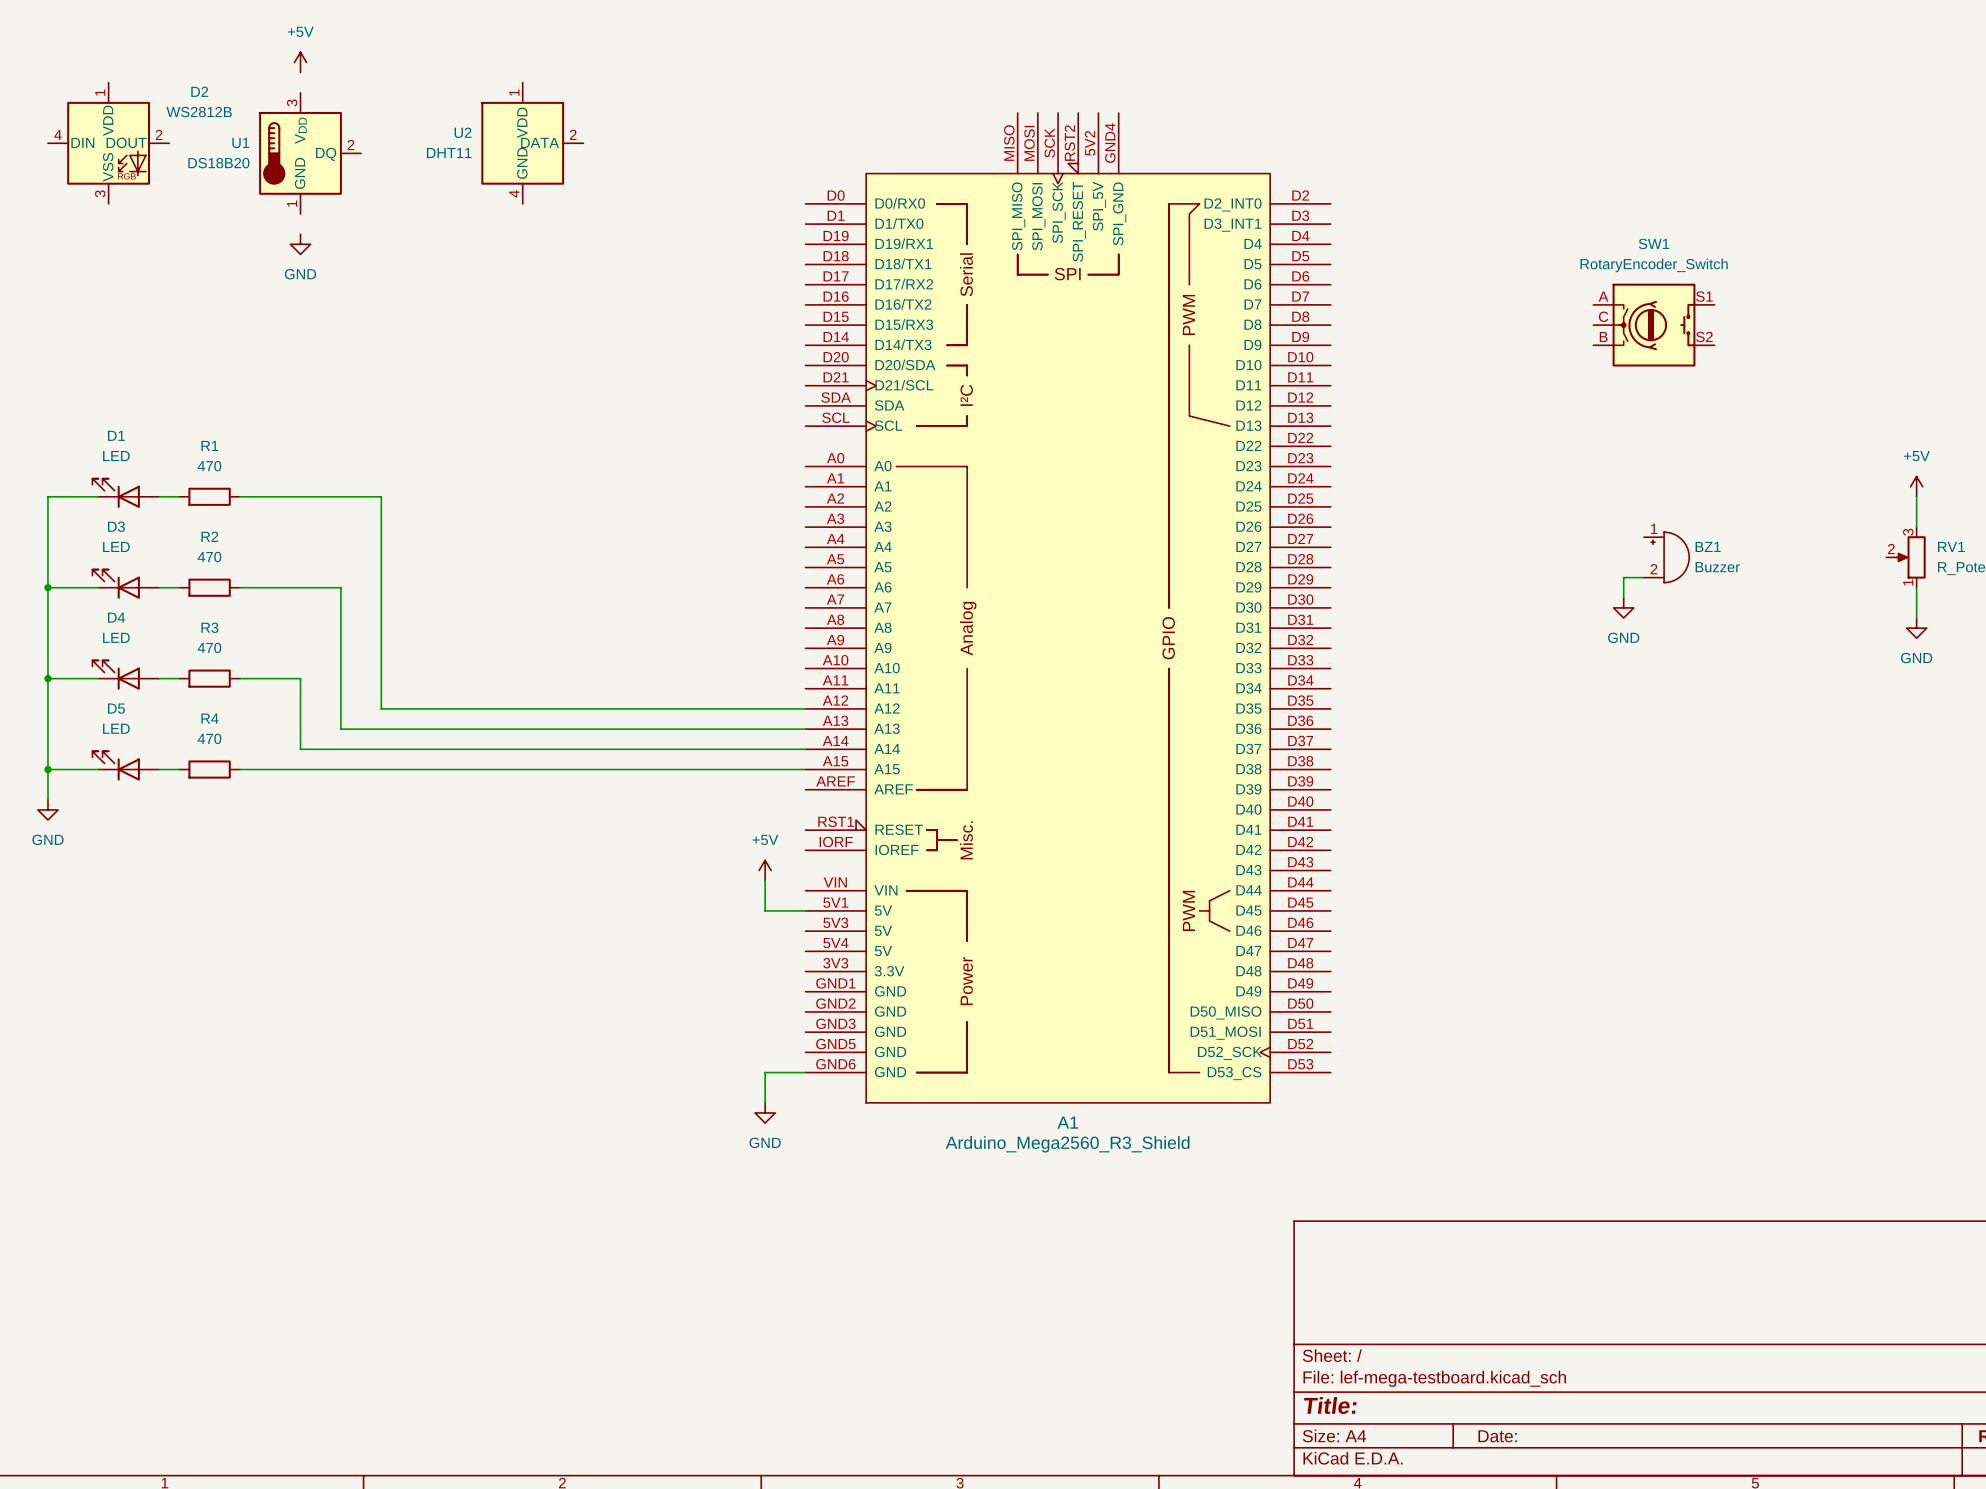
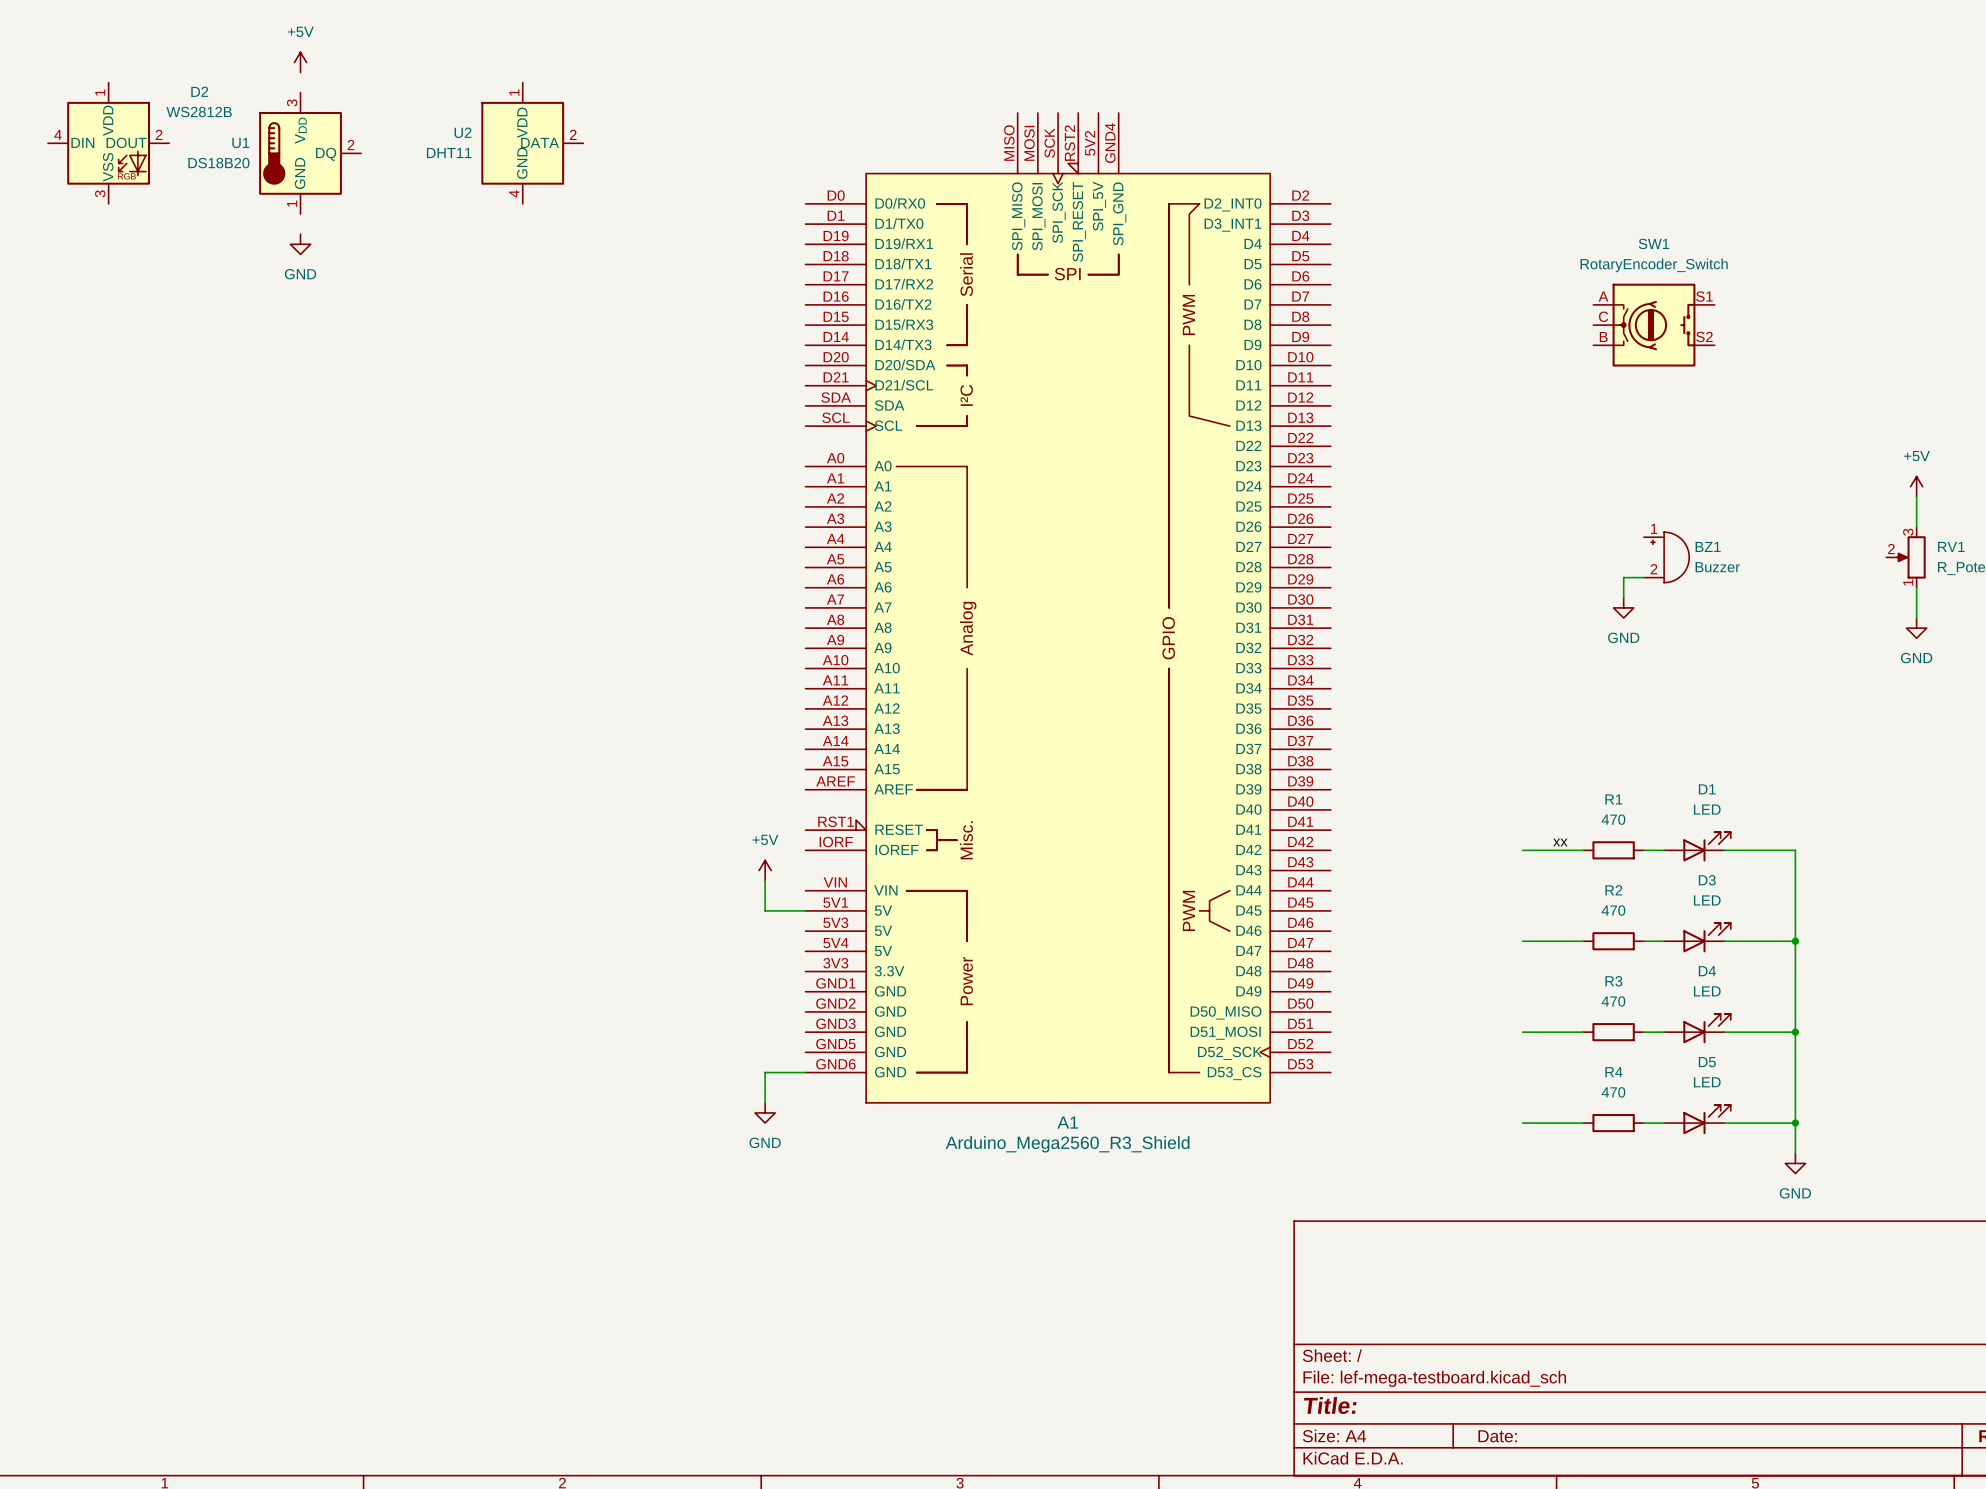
D1 flip: as is (116, 493) -> left-right (1707, 846)
D1 position: (125, 493) -> (1697, 846)
wire: (98, 496) (47, 496) (47, 799) -> none
wire: (159, 496) (179, 496) -> none
R1 position: (209, 496) -> (1613, 850)
wire: (239, 496) (381, 496) (381, 708) (805, 708) -> none
D3 flip: as is (116, 584) -> left-right (1707, 937)
D3 position: (125, 584) -> (1697, 937)
wire: (47, 587) (98, 587) -> none
junction: (47, 587) -> none
wire: (159, 587) (179, 587) -> none
R2 position: (209, 587) -> (1613, 941)
wire: (239, 587) (340, 587) (340, 729) (805, 729) -> none
D4 flip: as is (116, 675) -> left-right (1707, 1028)
D4 position: (125, 675) -> (1697, 1028)
wire: (47, 678) (98, 678) -> none
junction: (47, 678) -> none
wire: (159, 678) (179, 678) -> none
R3 position: (209, 678) -> (1613, 1032)
wire: (239, 678) (300, 678) (300, 749) (805, 749) -> none
D5 flip: as is (116, 765) -> left-right (1707, 1119)
D5 position: (125, 765) -> (1697, 1119)
wire: (47, 769) (98, 769) -> none
junction: (47, 769) -> none
wire: (159, 769) (179, 769) -> none
R4 position: (209, 769) -> (1613, 1123)
wire: (239, 769) (805, 769) -> none
power symbol: GND (47, 809) -> none
label: none -> xx (1560, 842)
wire: none -> (1522, 850) (1583, 850)
wire: none -> (1643, 850) (1664, 850)
wire: none -> (1724, 850) (1795, 850) (1795, 1153)
wire: none -> (1522, 941) (1583, 941)
wire: none -> (1643, 941) (1664, 941)
wire: none -> (1724, 941) (1795, 941)
junction: none -> (1795, 941)
wire: none -> (1522, 1032) (1583, 1032)
wire: none -> (1643, 1032) (1664, 1032)
wire: none -> (1724, 1032) (1795, 1032)
junction: none -> (1795, 1032)
wire: none -> (1522, 1123) (1583, 1123)
wire: none -> (1643, 1123) (1664, 1123)
wire: none -> (1724, 1123) (1795, 1123)
junction: none -> (1795, 1123)
power symbol: none -> GND (1795, 1163)

